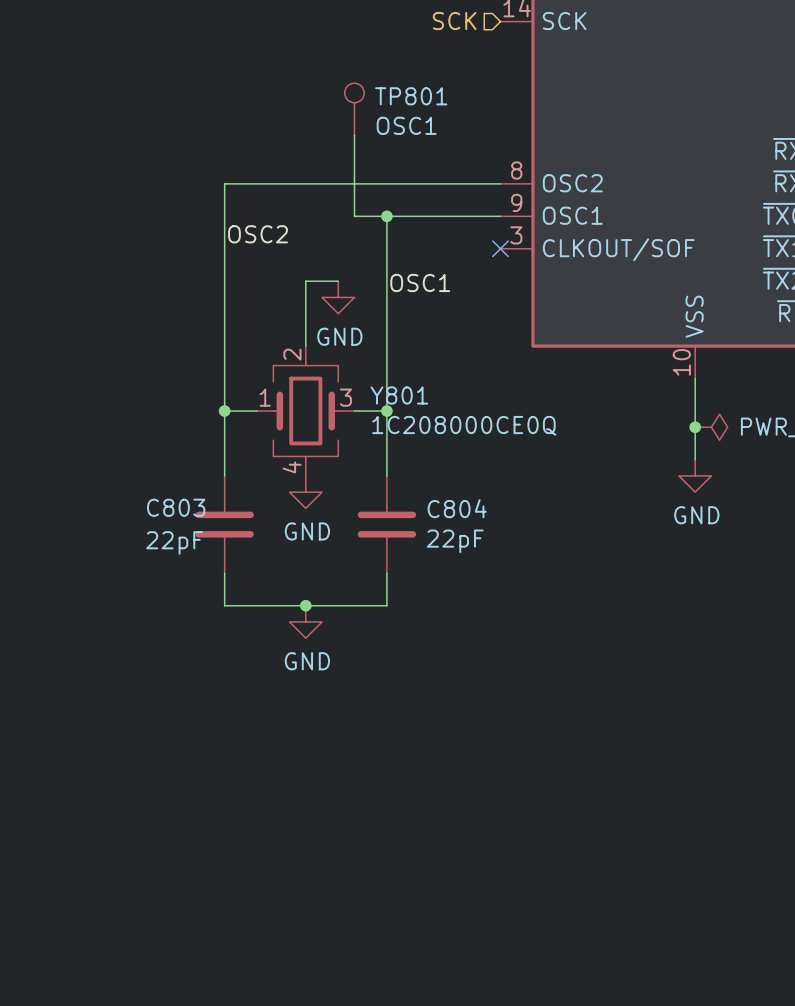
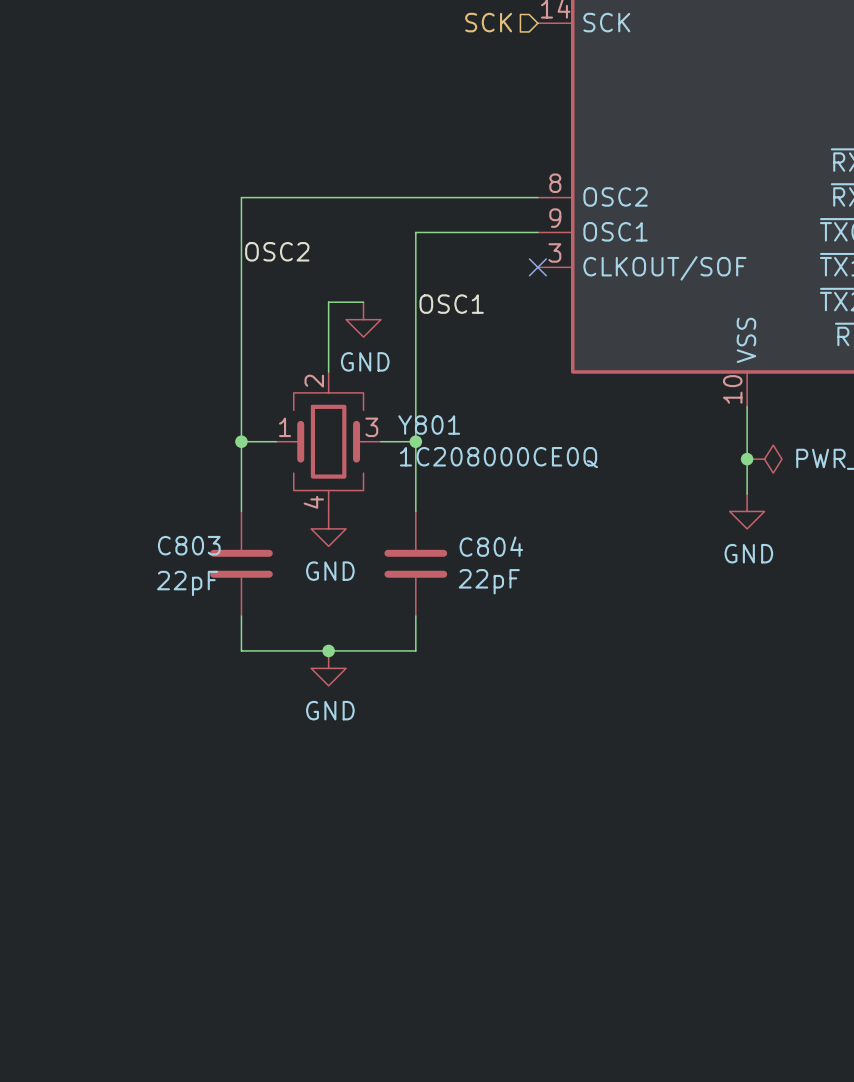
TP801: OSC1 (354, 109) -> none
wire: (354, 135) (354, 216) (386, 216) -> none
junction: (386, 216) -> none

